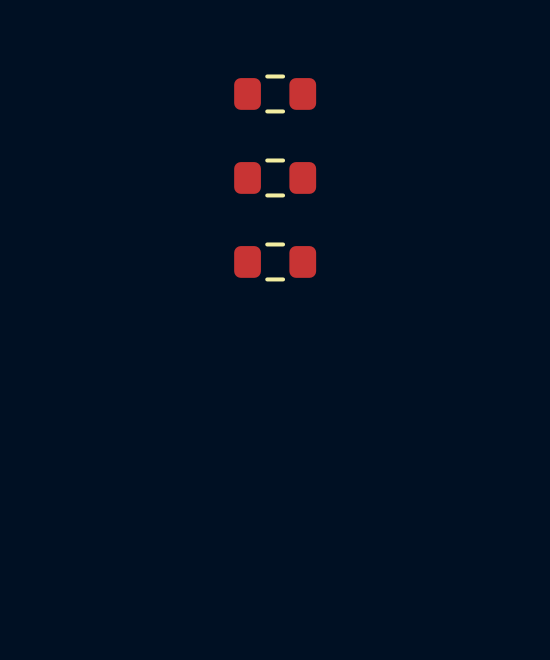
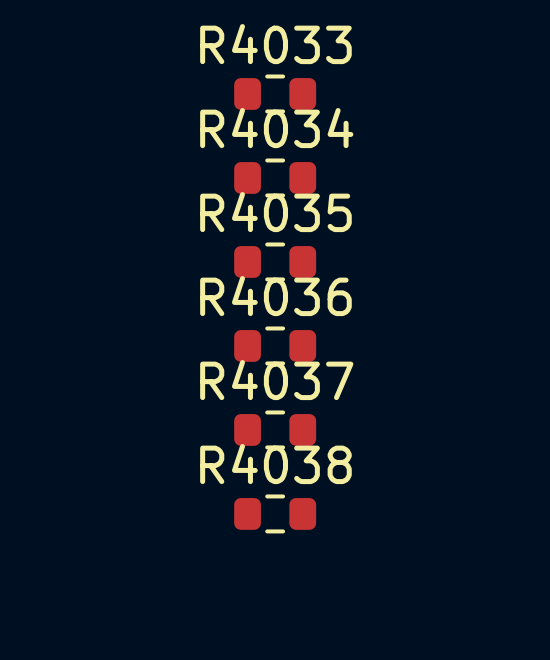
R4033 name: none -> R4033 (275, 44)
R4034 name: none -> R4034 (276, 128)
R4035 name: none -> R4035 (275, 212)
R4036: none -> (275, 345)
R4037: none -> (275, 429)
R4038: none -> (275, 513)

